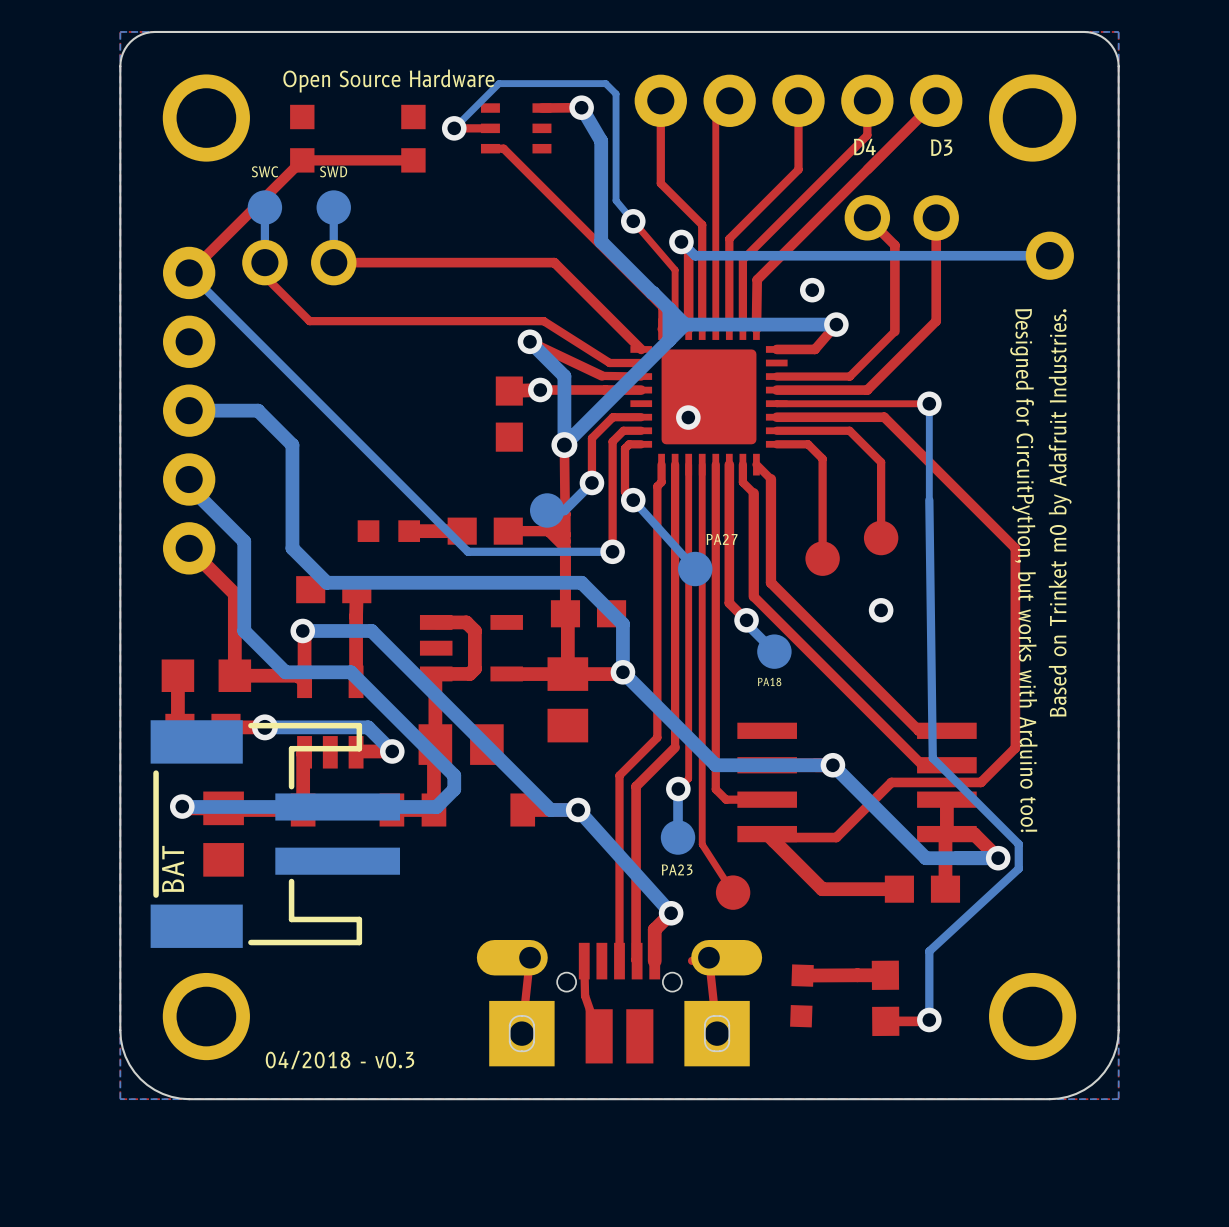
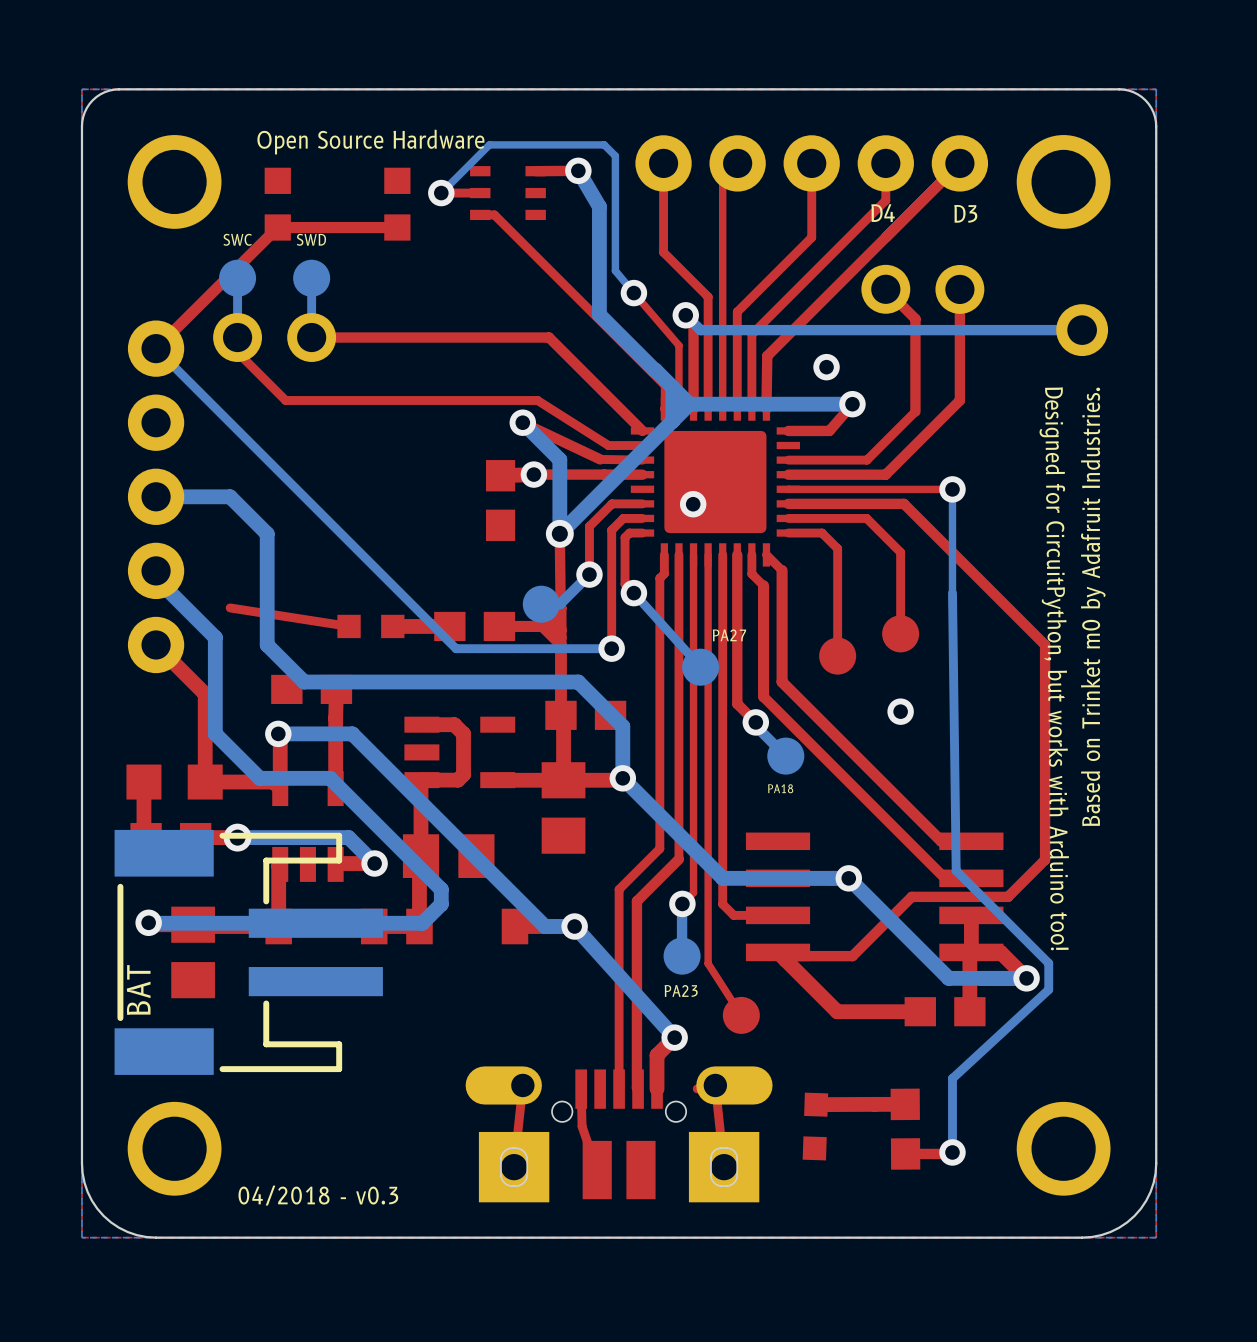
top track: none -> (230, 607) (349, 626)

